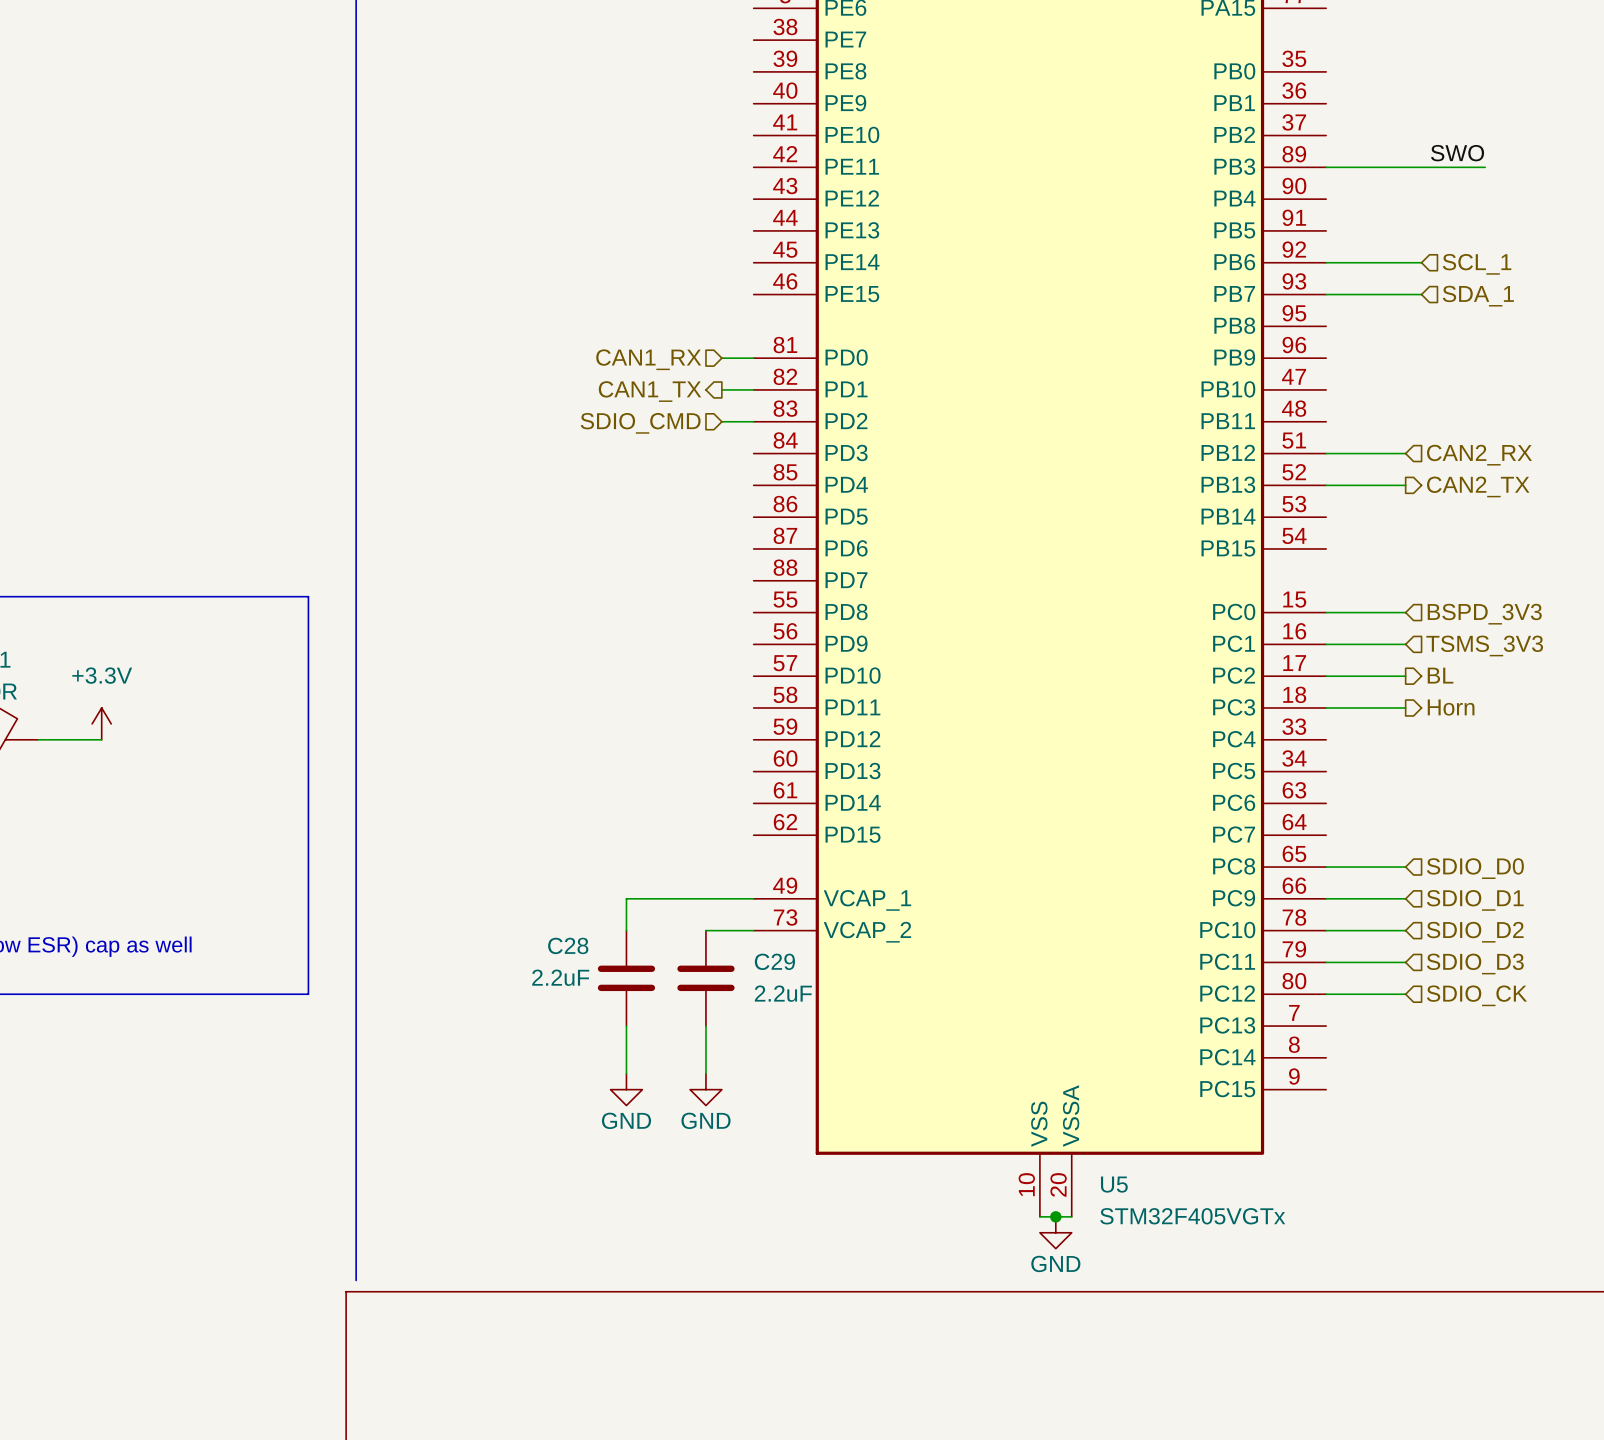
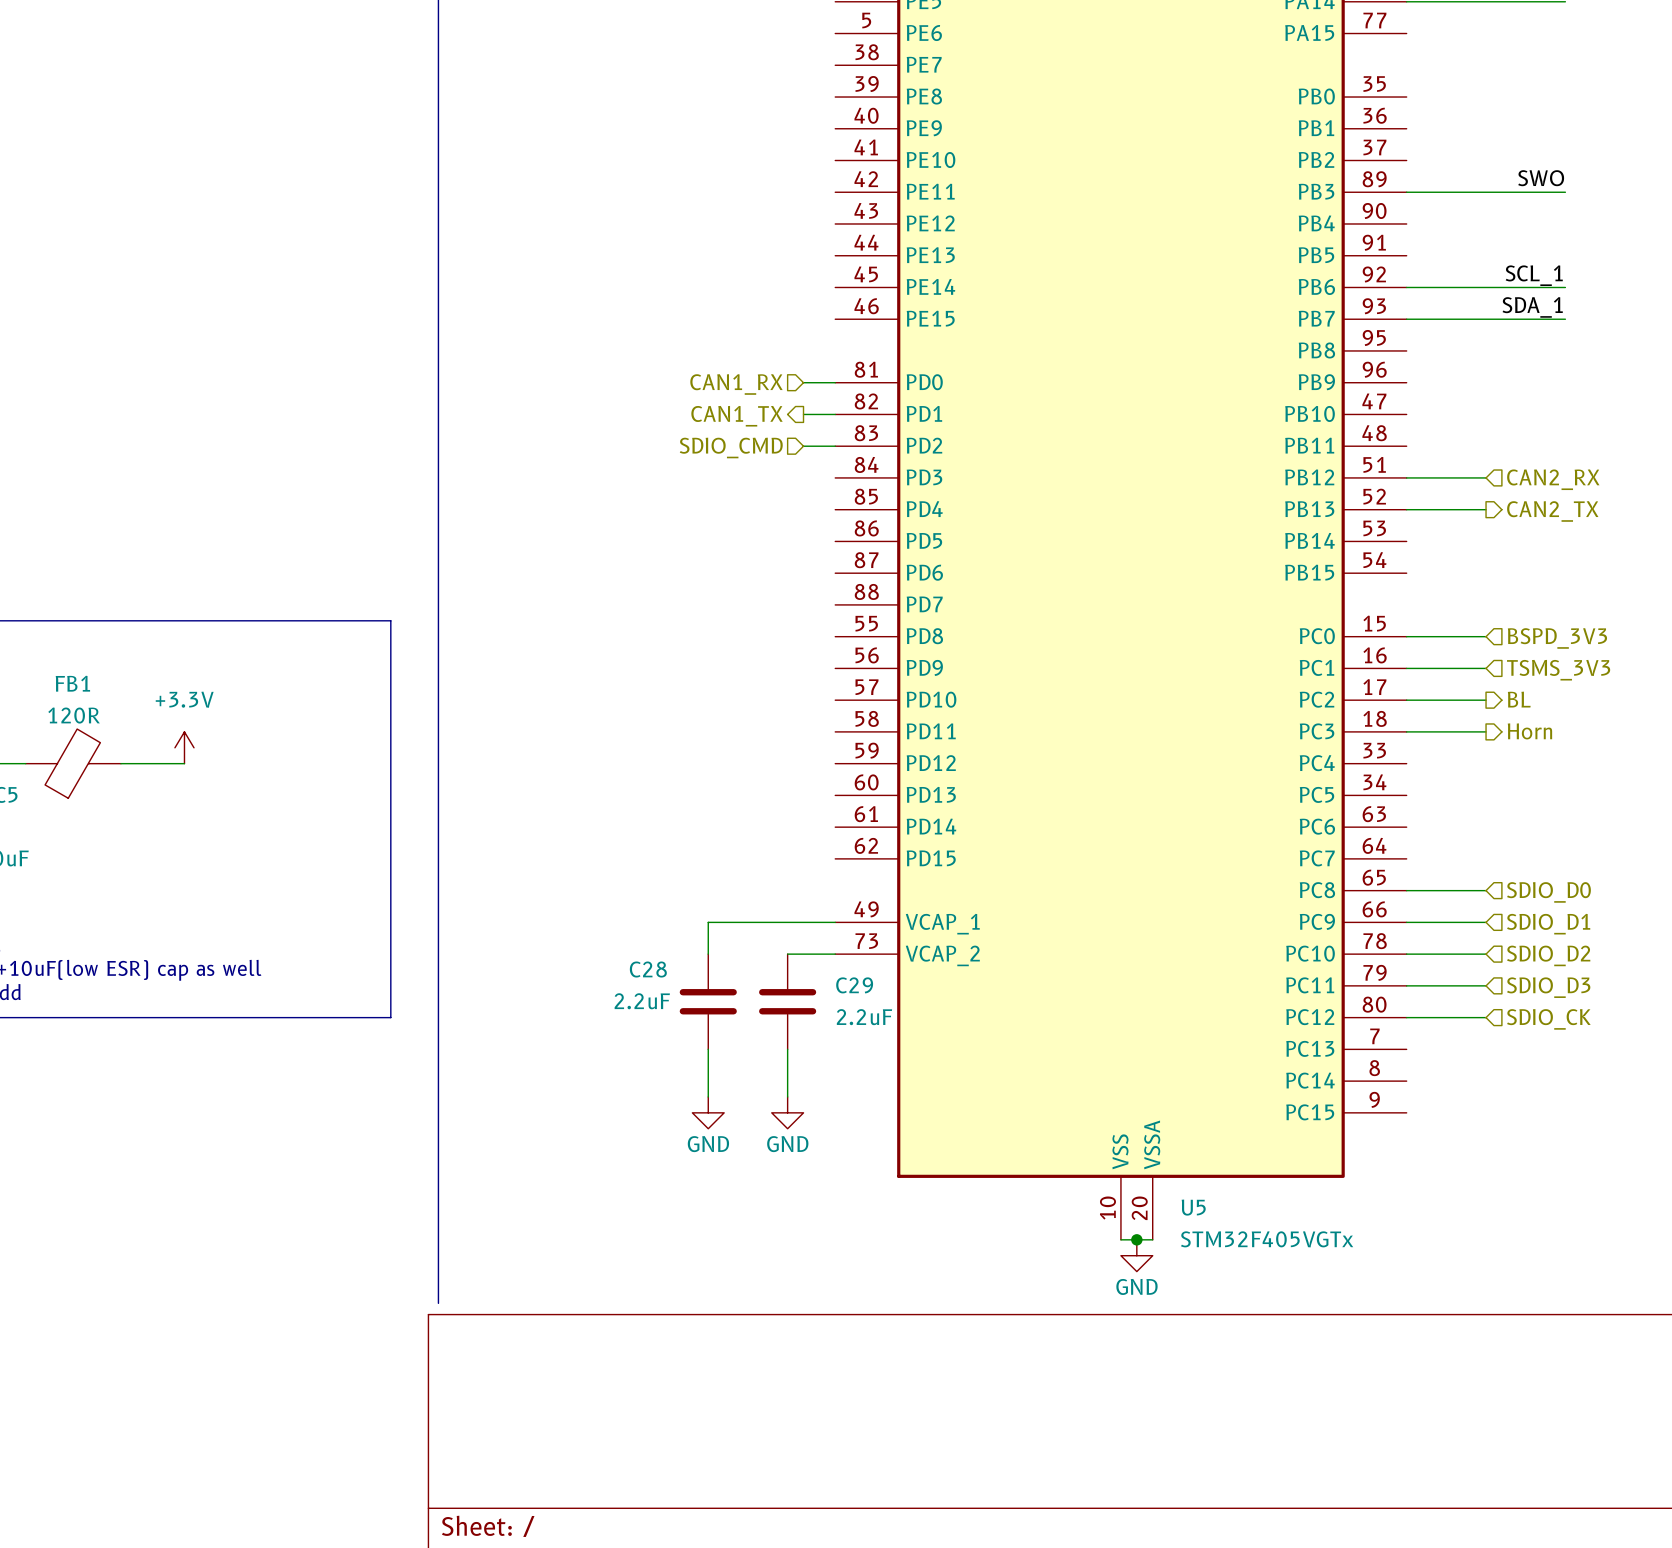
label: none -> SCL_1 (1534, 275)
wire: none -> (1501, 287) (1565, 287)
hierarchical label: SCL_1 (1477, 264) -> none
label: none -> SDA_1 (1532, 307)
wire: none -> (1501, 319) (1565, 319)
hierarchical label: SDA_1 (1478, 296) -> none

